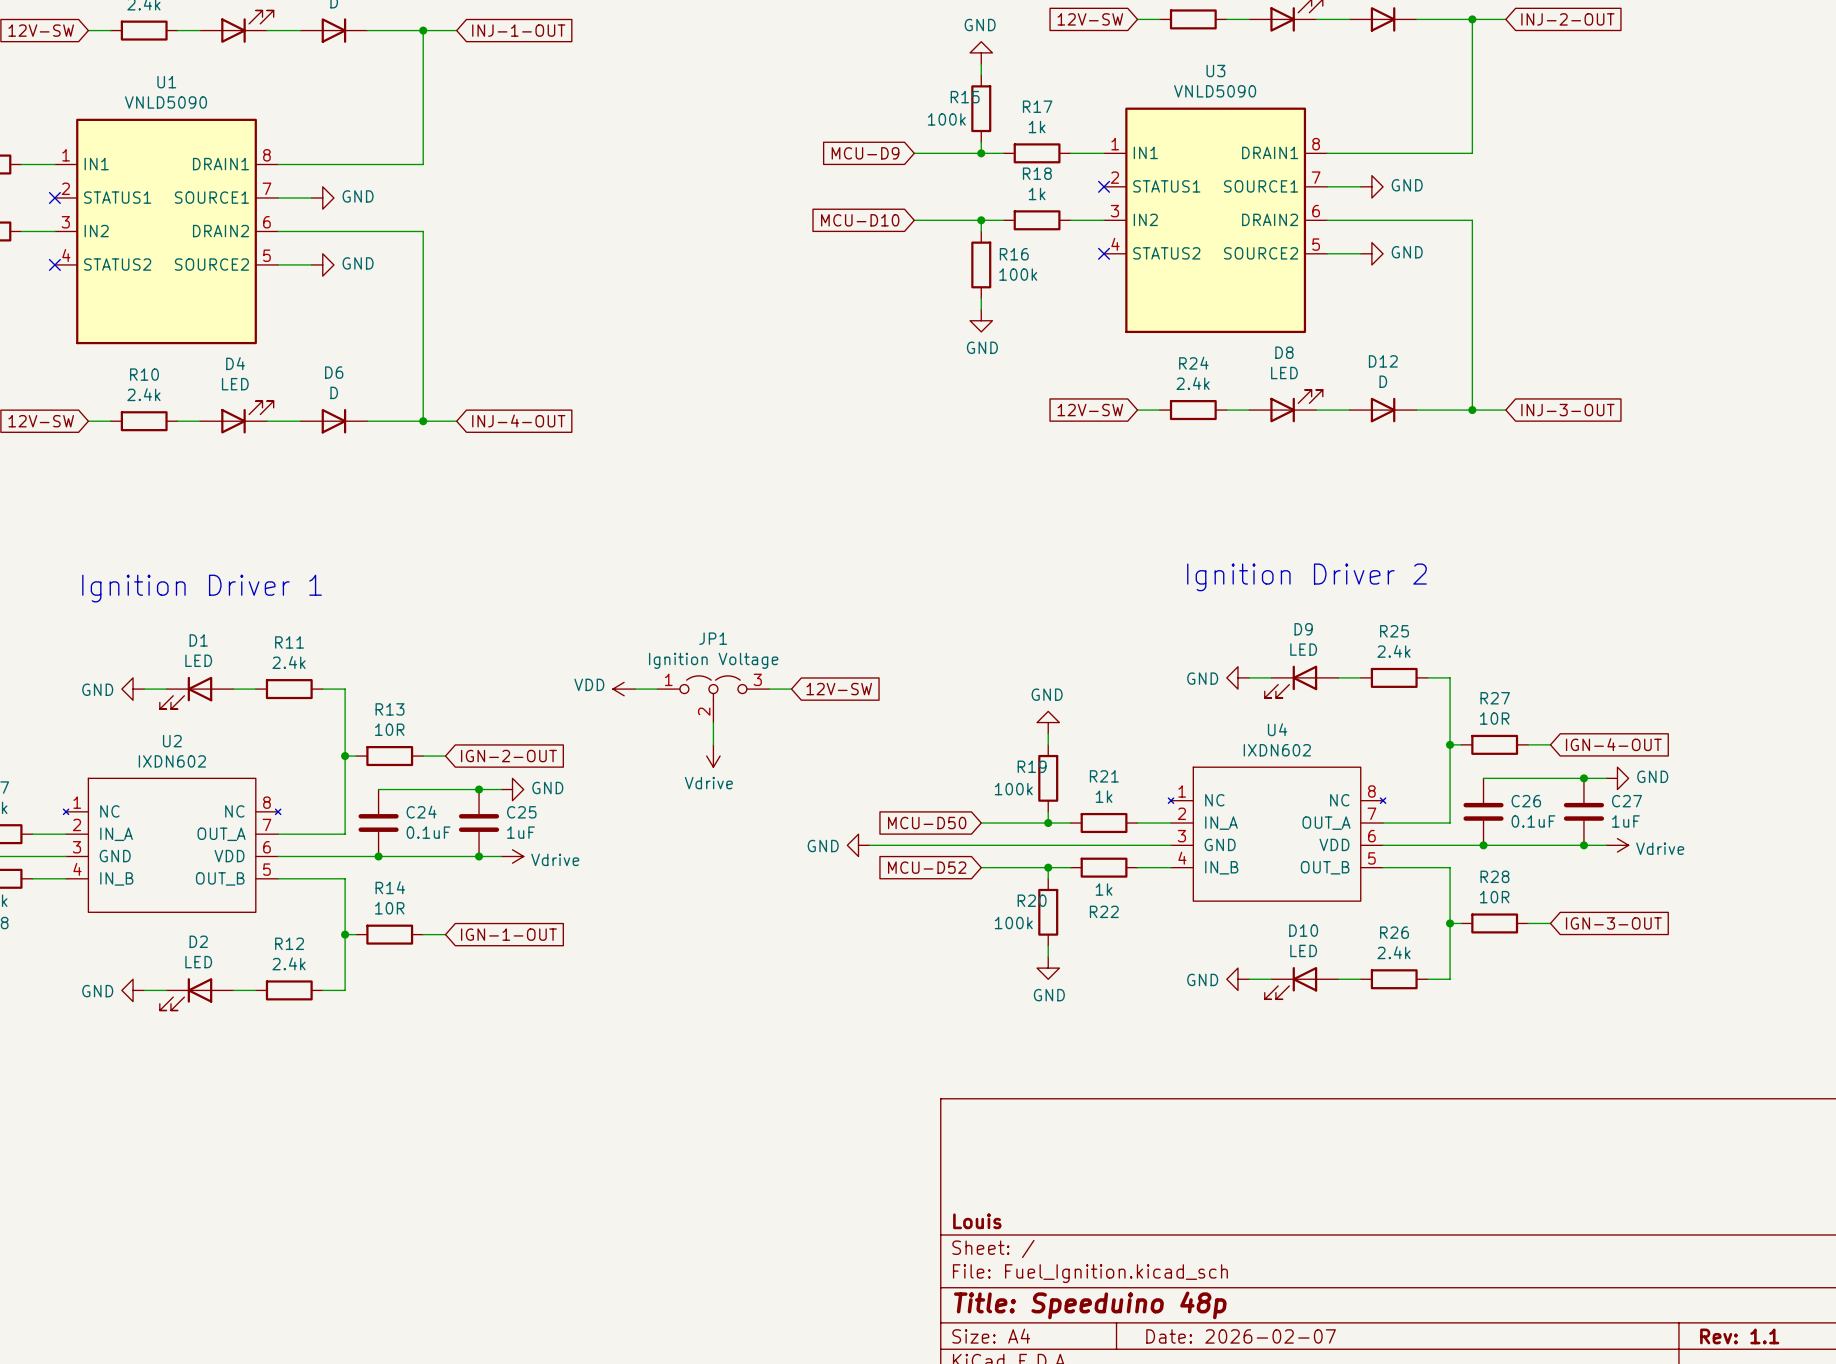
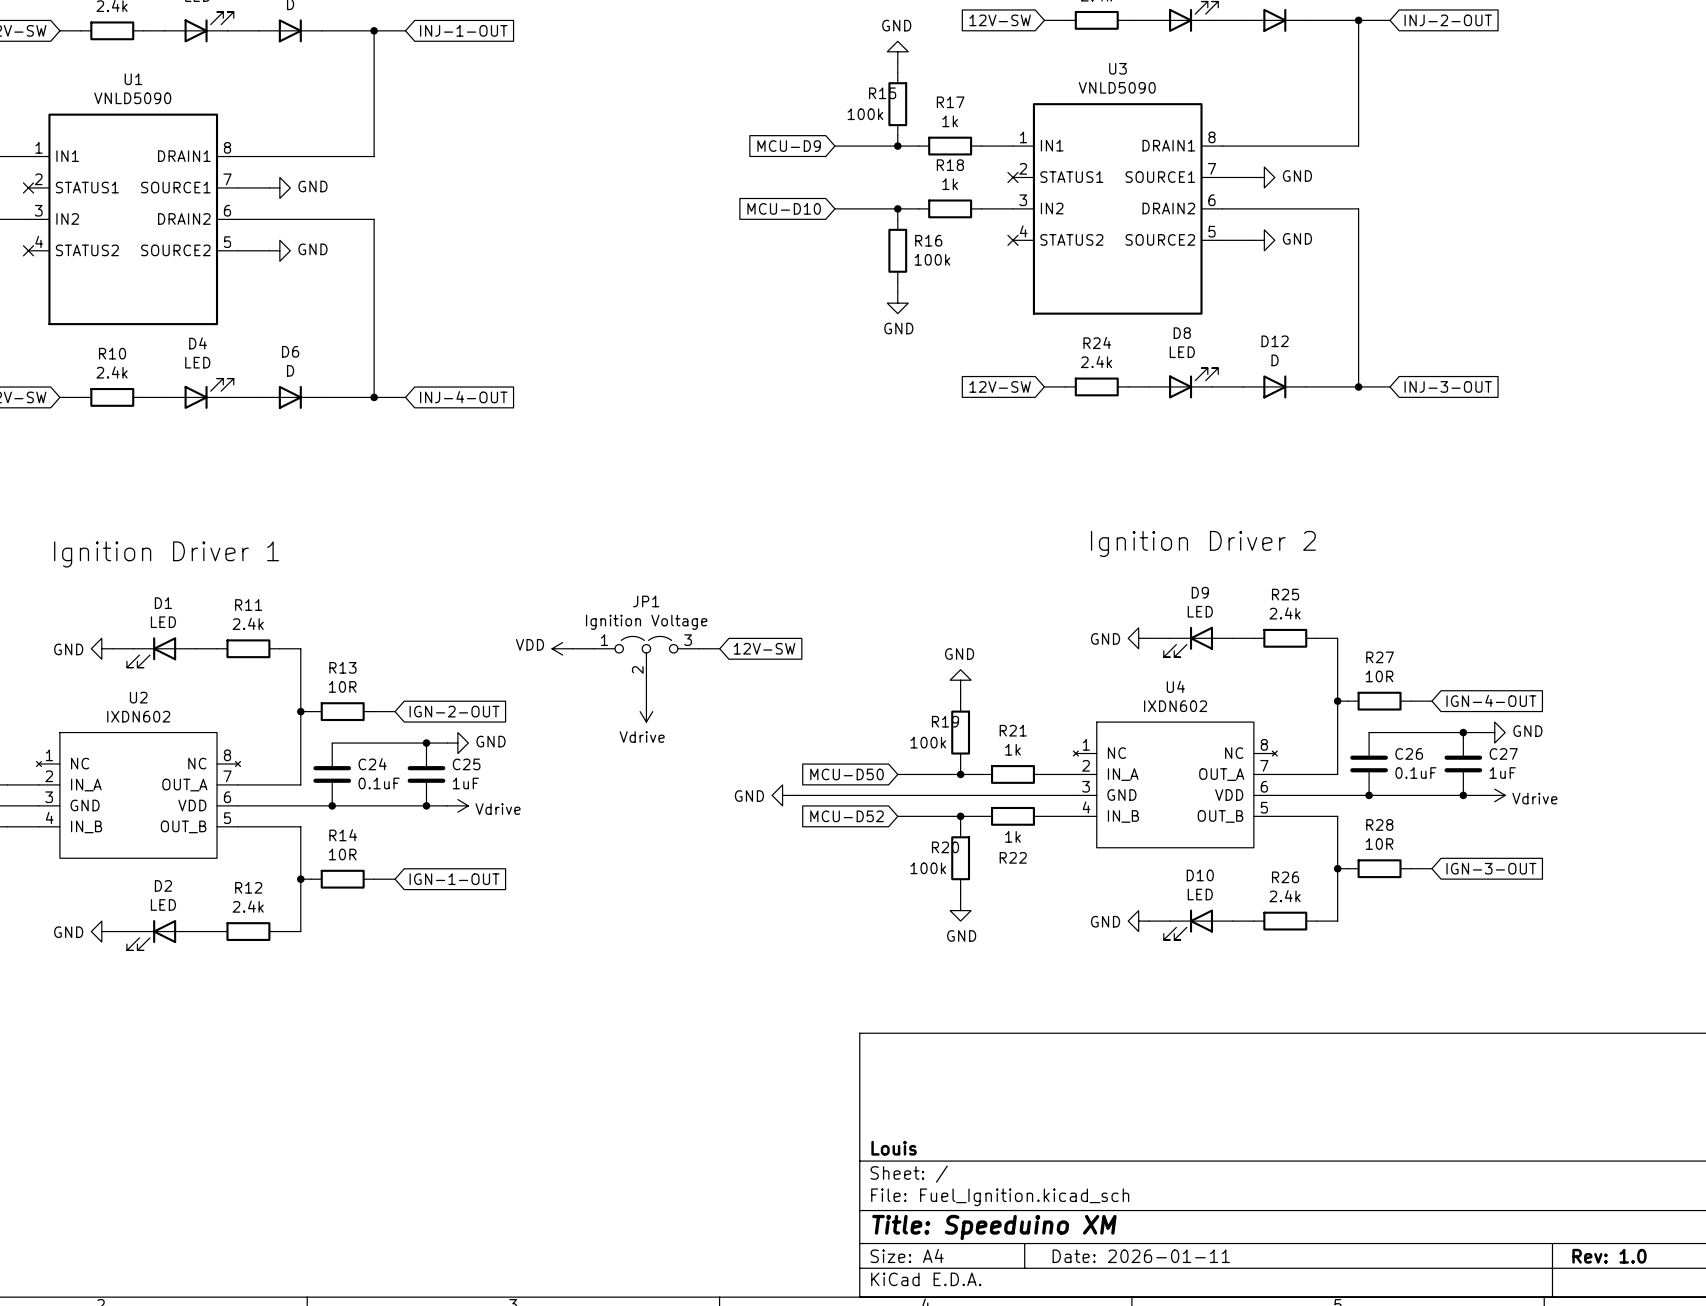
title block: Title: Speeduino 48p (1090, 1305) -> Title: Speeduino XM (994, 1227)
title block: Date: 2026-02-07 (1241, 1336) -> Date: 2026-01-11 (1141, 1256)
title block: Rev: 1.1 (1739, 1336) -> Rev: 1.0 (1609, 1256)

